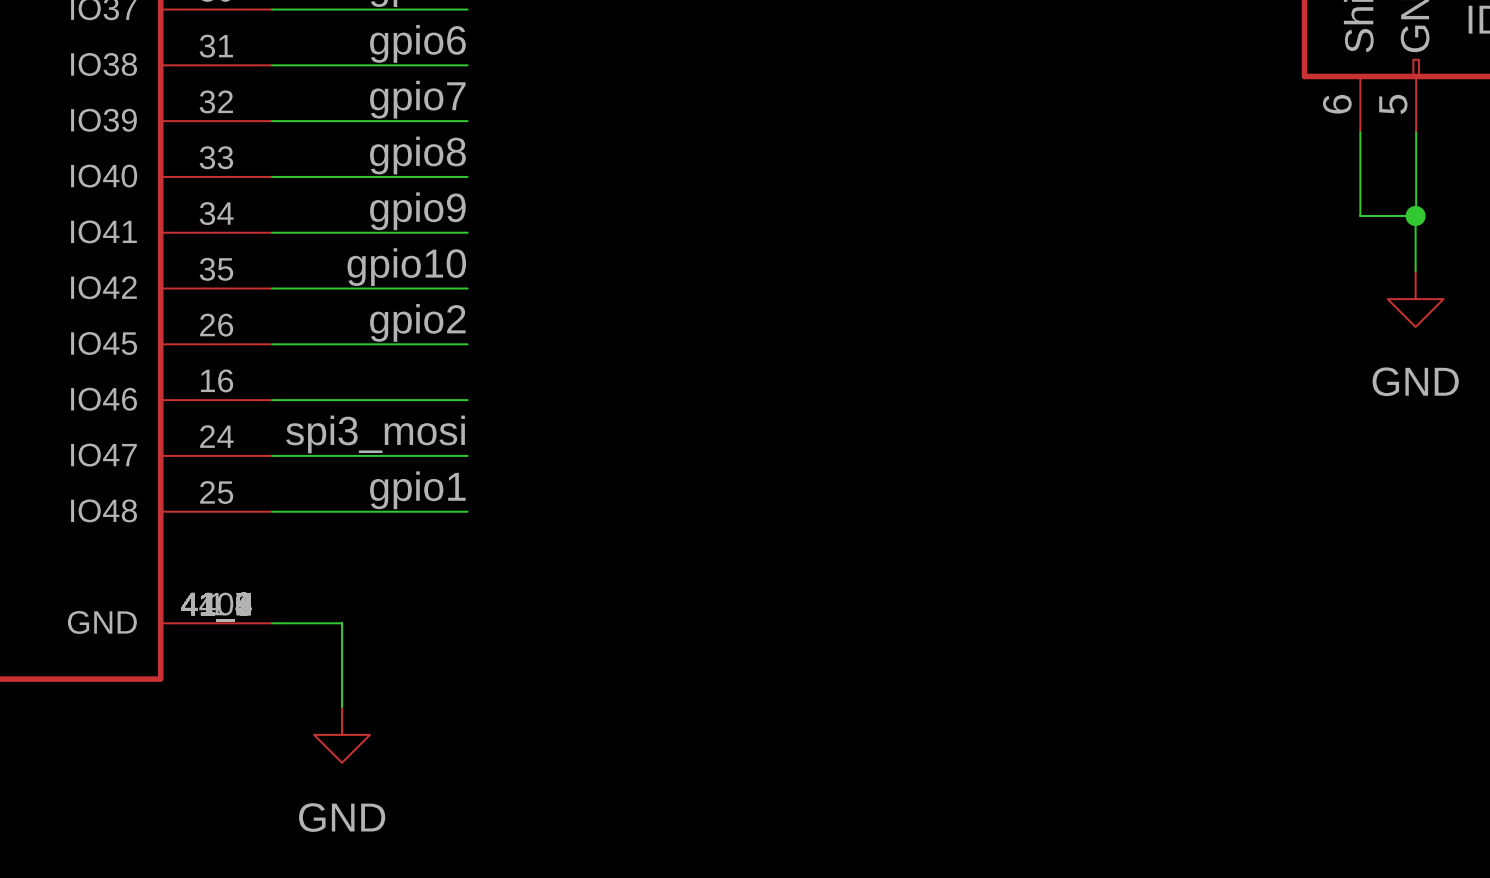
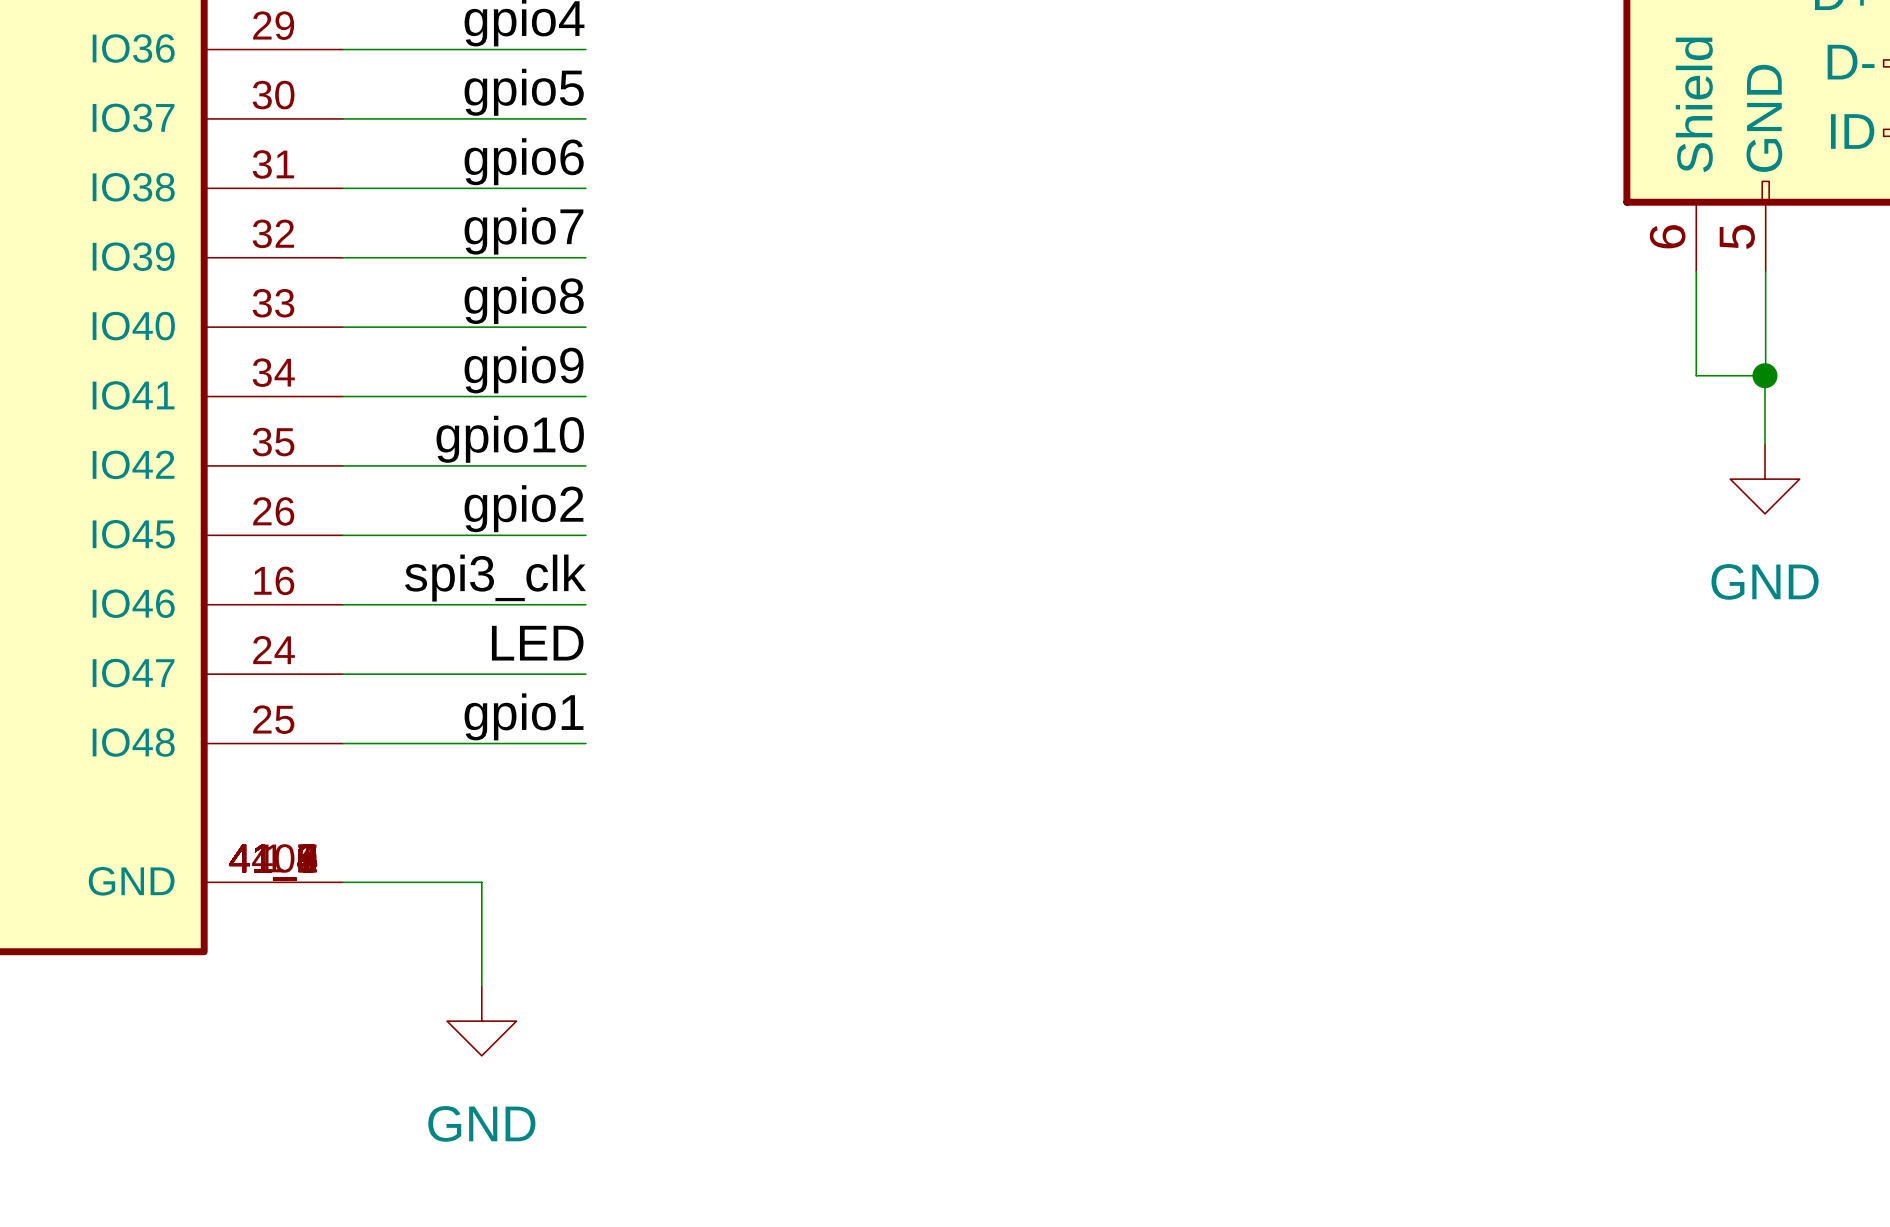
label: none -> spi3_clk (495, 578)
label: spi3_mosi (375, 434) -> LED (537, 643)
wire: (342, 623) (342, 707) -> (429, 882) (481, 882) (481, 986)
power symbol position: GND (342, 734) -> GND (481, 1021)

